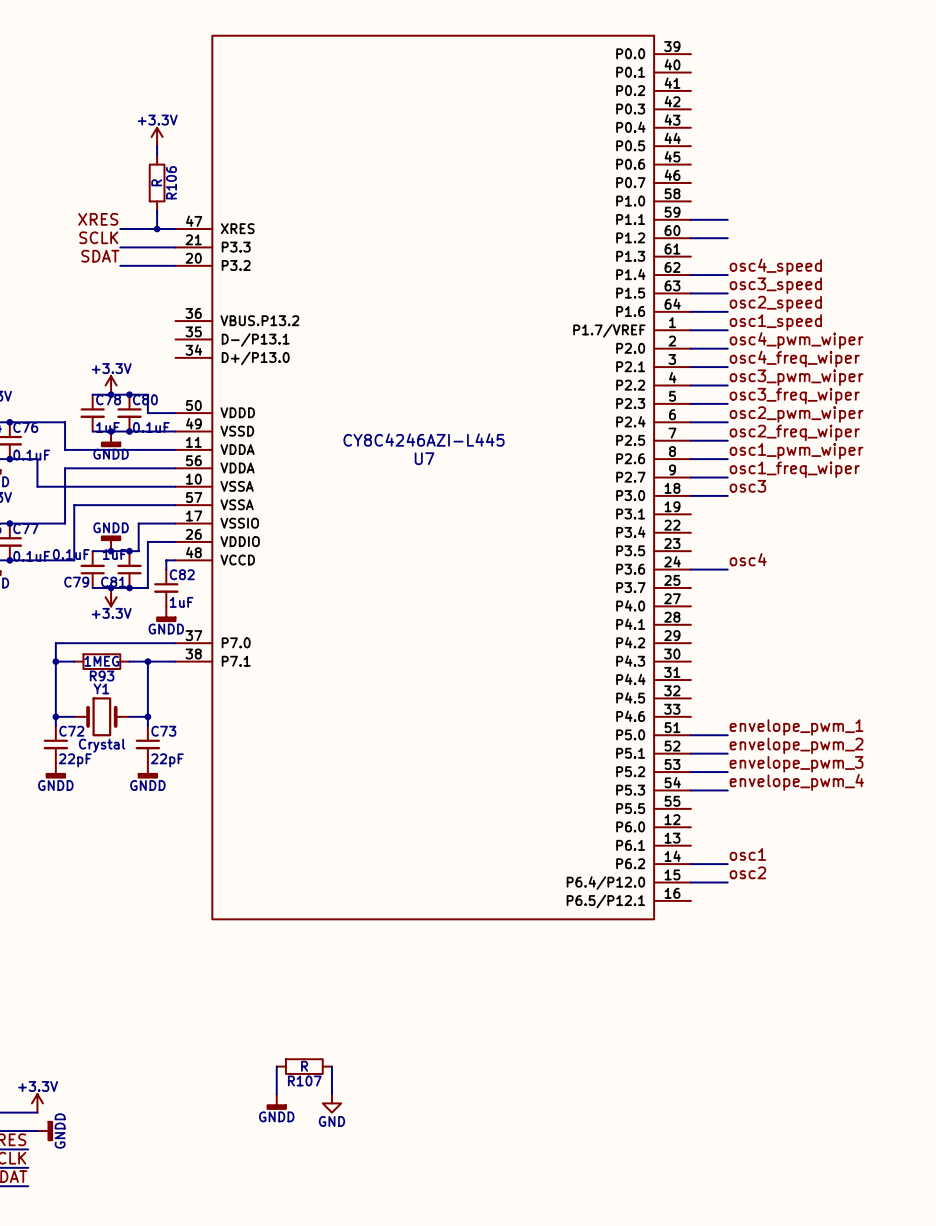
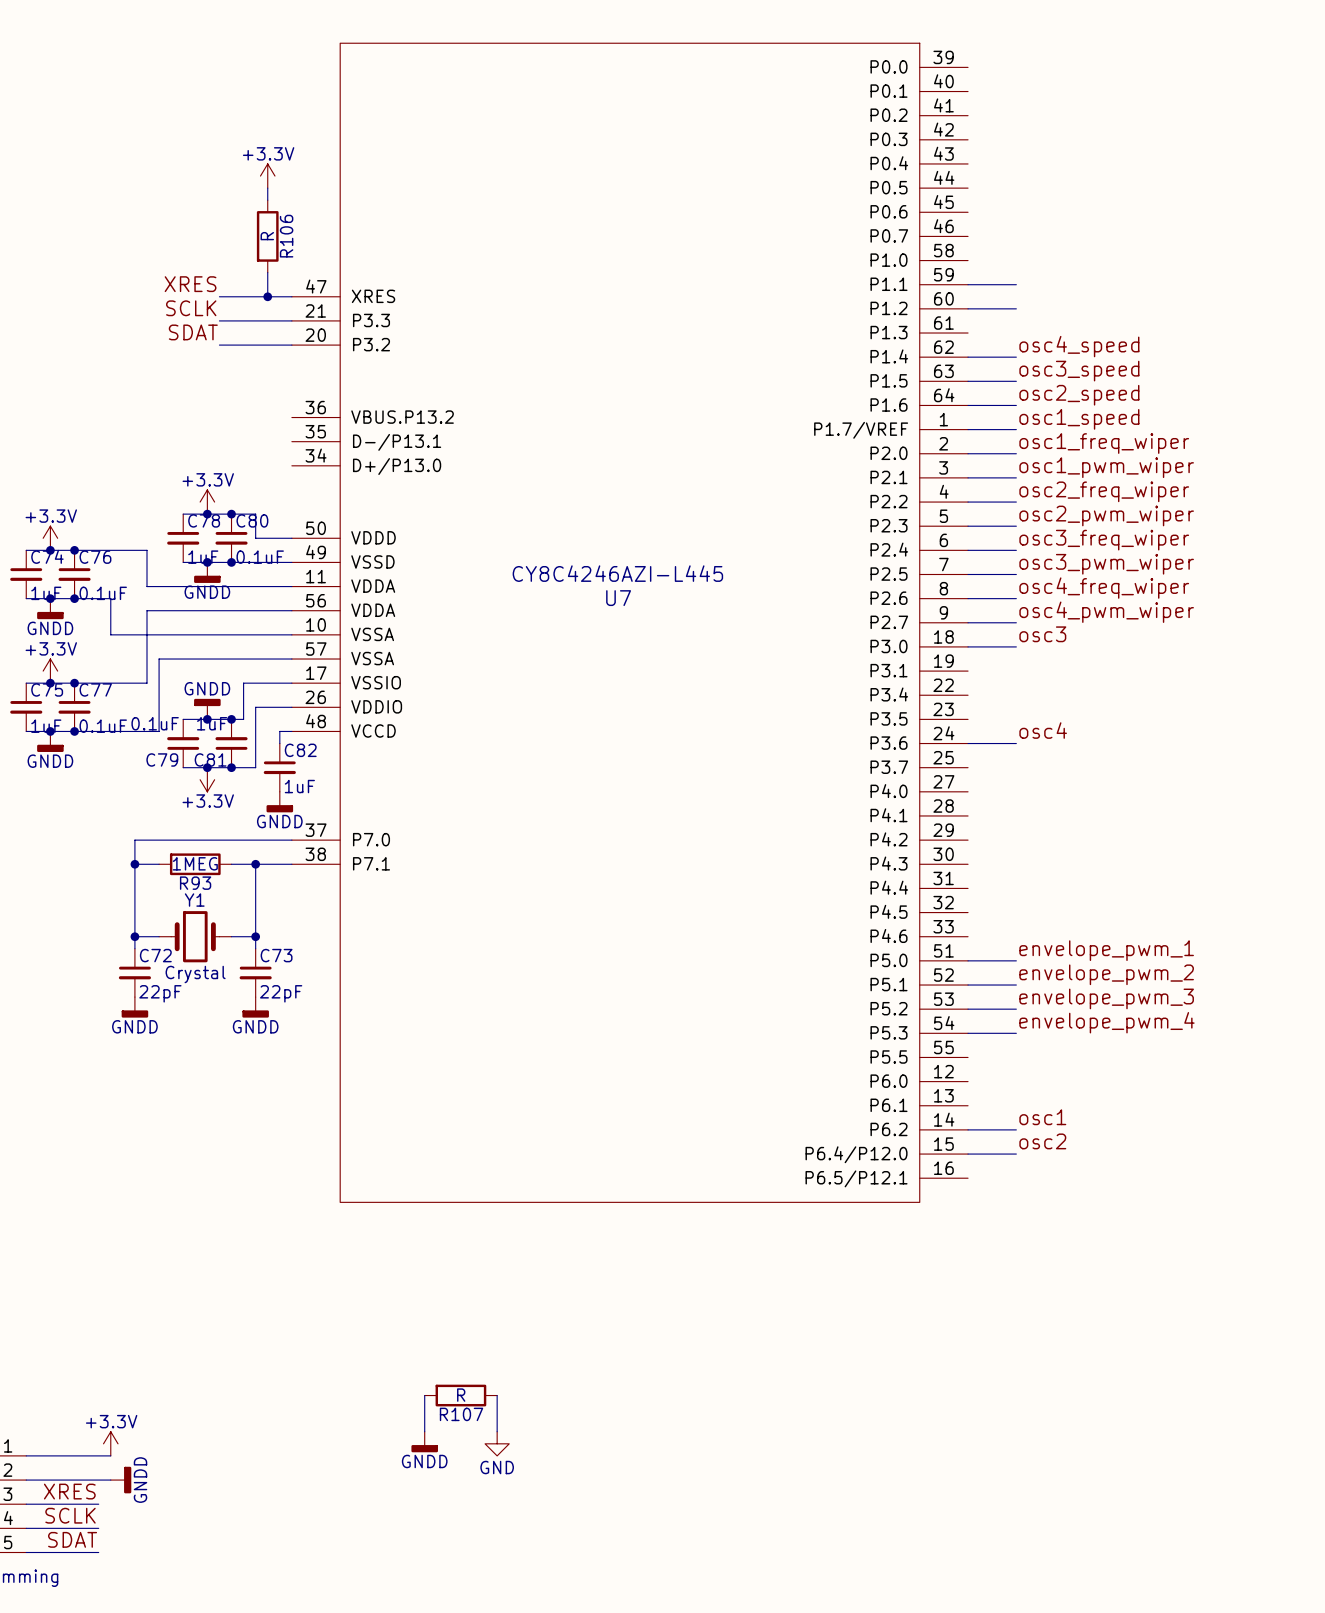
label: osc4_pwm_wiper (796, 340) -> osc1_freq_wiper (1104, 443)
label: osc4_freq_wiper (794, 359) -> osc1_pwm_wiper (1106, 467)
label: osc3_pwm_wiper (796, 377) -> osc2_freq_wiper (1104, 491)
label: osc3_freq_wiper (794, 396) -> osc2_pwm_wiper (1106, 515)
label: osc2_pwm_wiper (796, 414) -> osc3_freq_wiper (1104, 540)
label: osc2_freq_wiper (794, 432) -> osc3_pwm_wiper (1106, 564)
label: osc1_pwm_wiper (796, 451) -> osc4_freq_wiper (1104, 588)
label: osc1_freq_wiper (794, 469) -> osc4_pwm_wiper (1106, 612)

